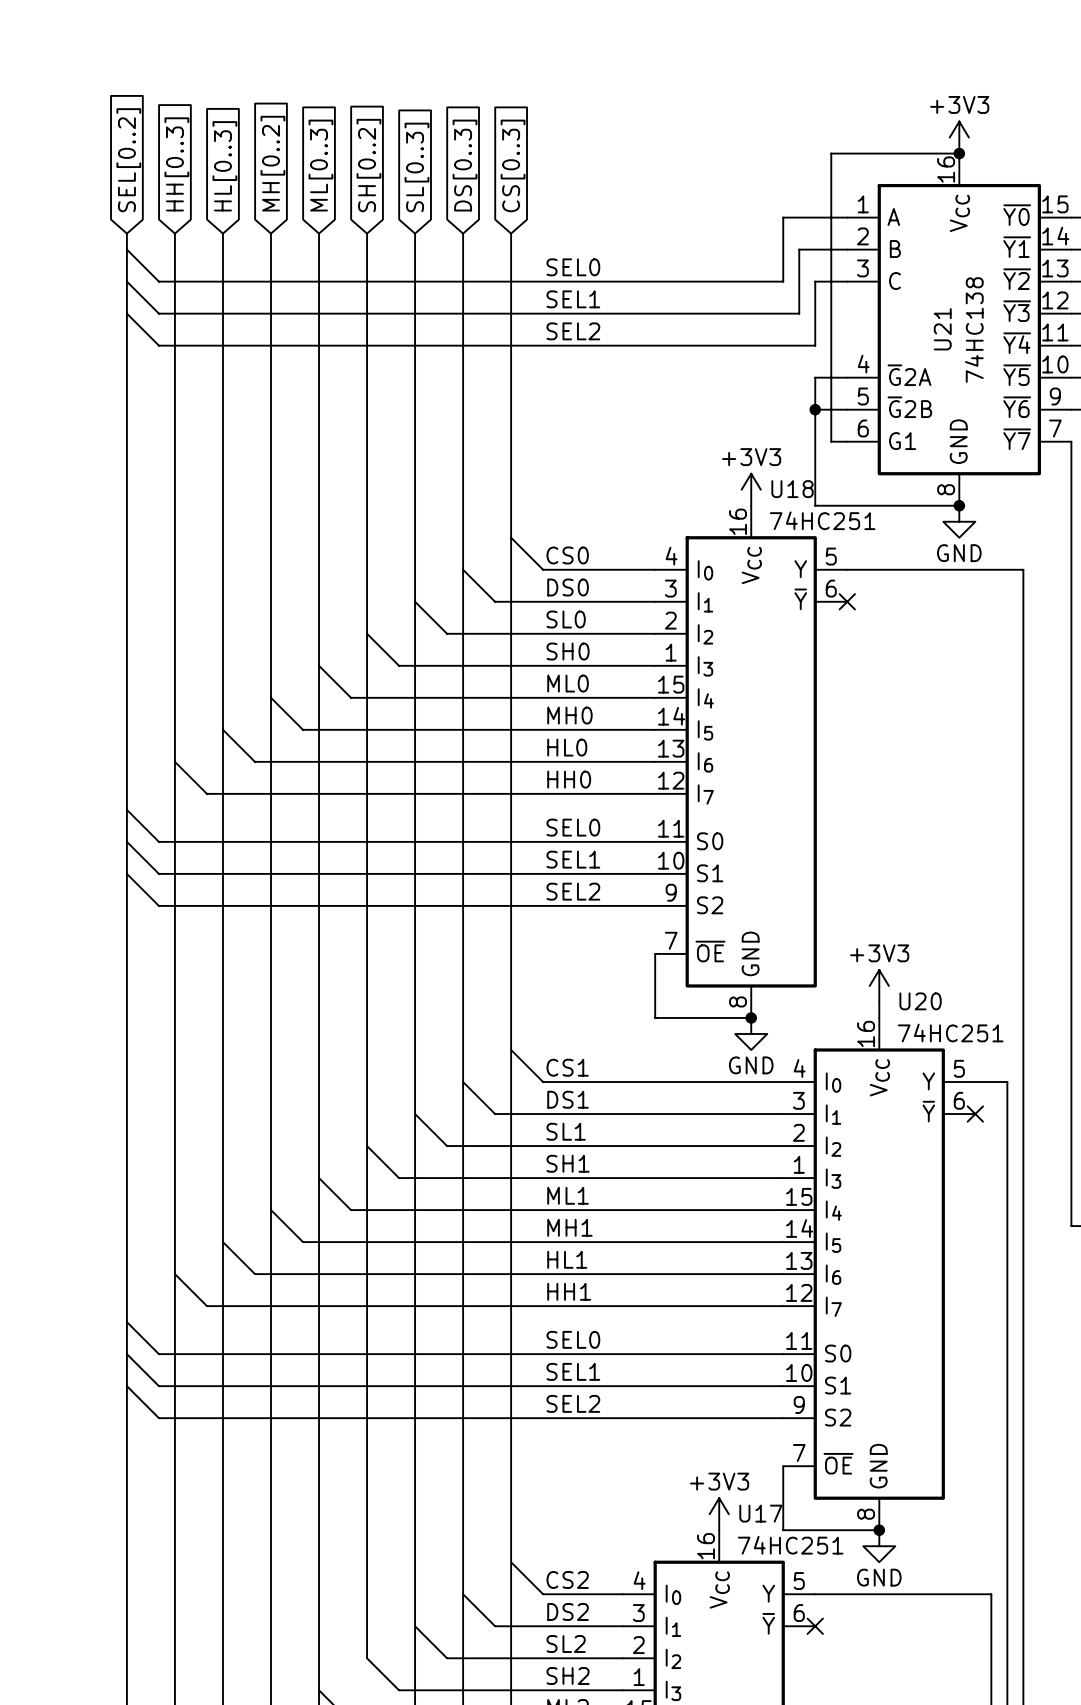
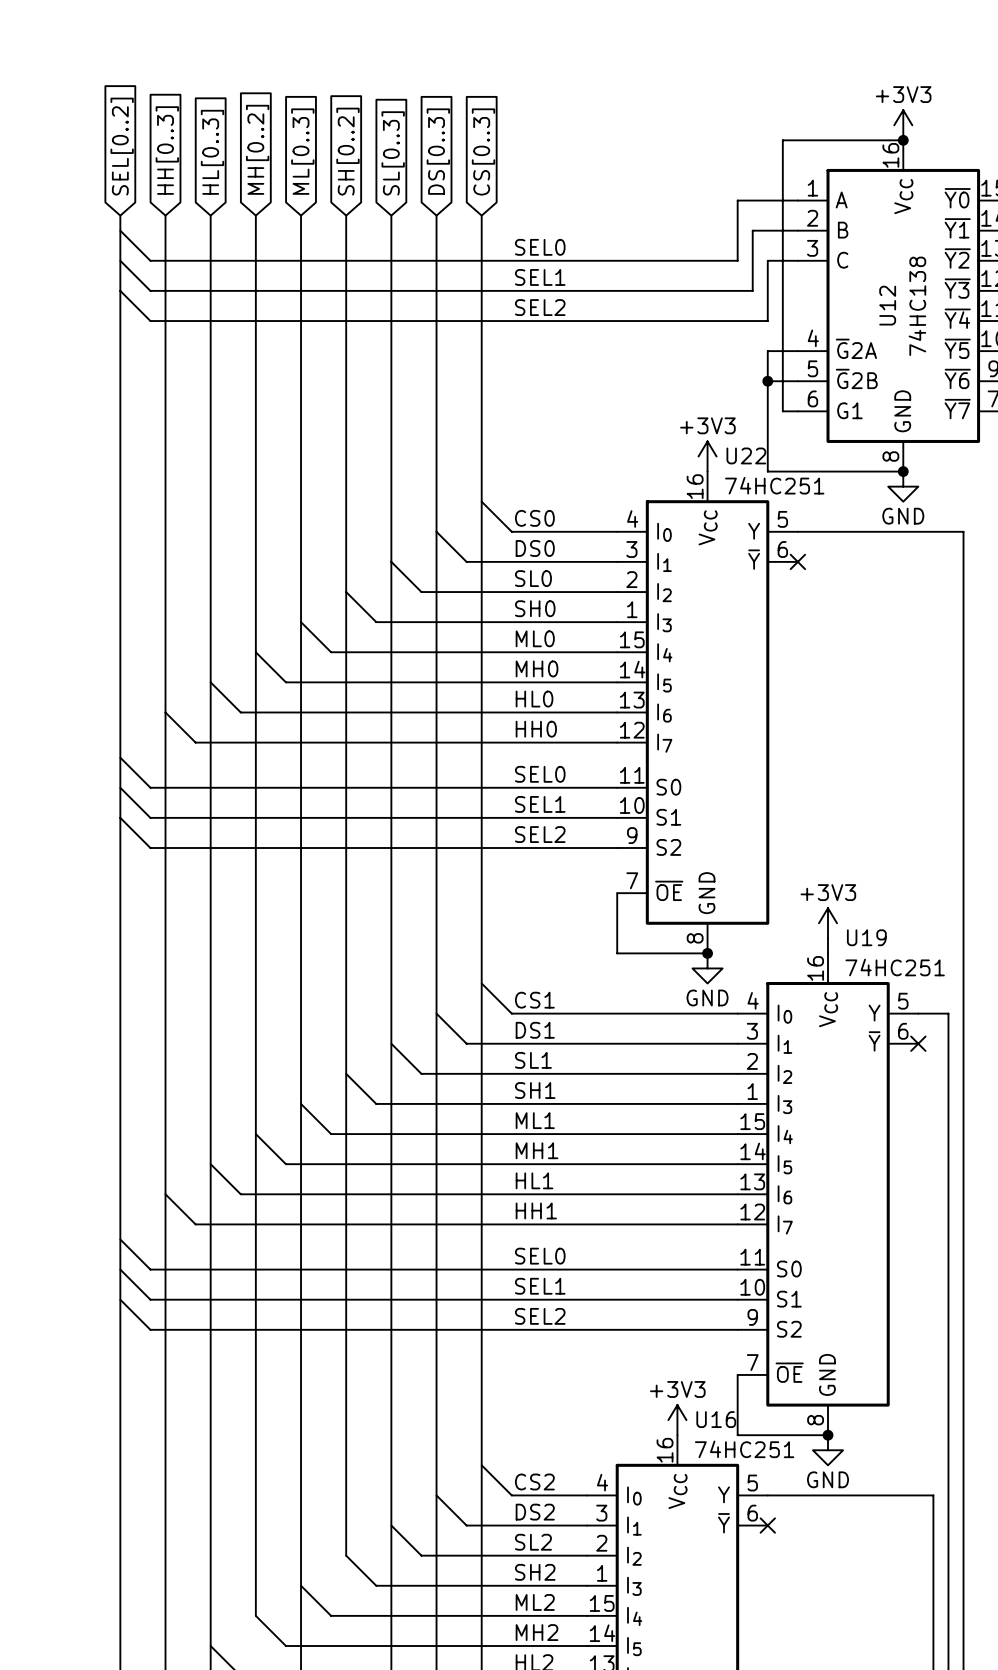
U21 name: U21 (942, 329) -> U12 (887, 305)
U18 name: U18 (792, 489) -> U22 (746, 455)
U20 name: U20 (920, 1001) -> U19 (866, 937)
U17 name: U17 (760, 1513) -> U16 (716, 1419)

